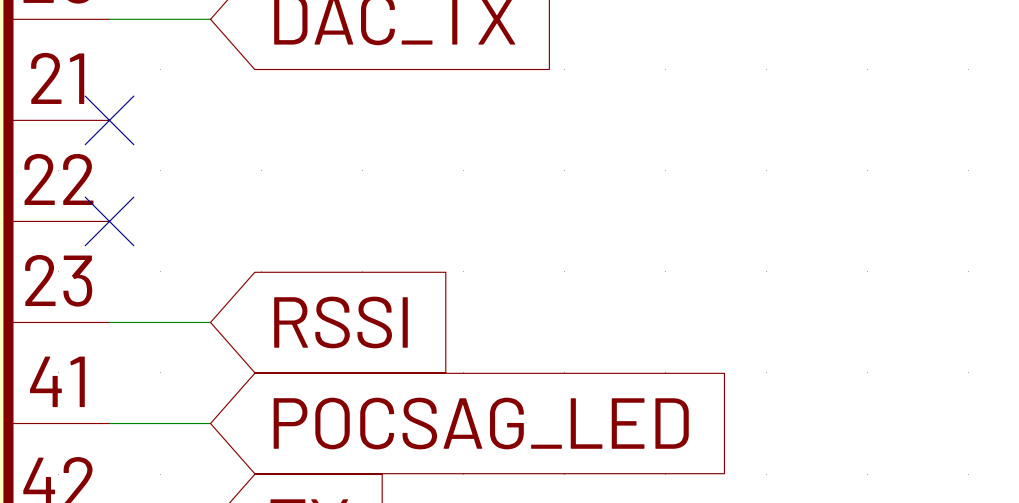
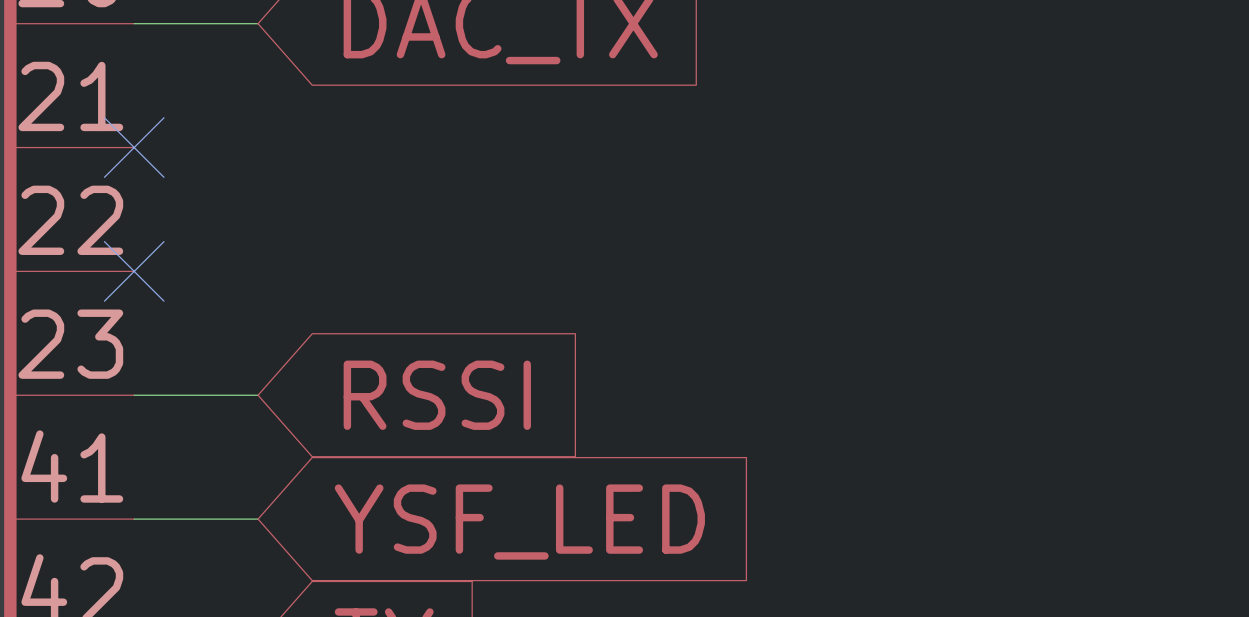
global label: POCSAG_LED (481, 423) -> YSF_LED (519, 522)

